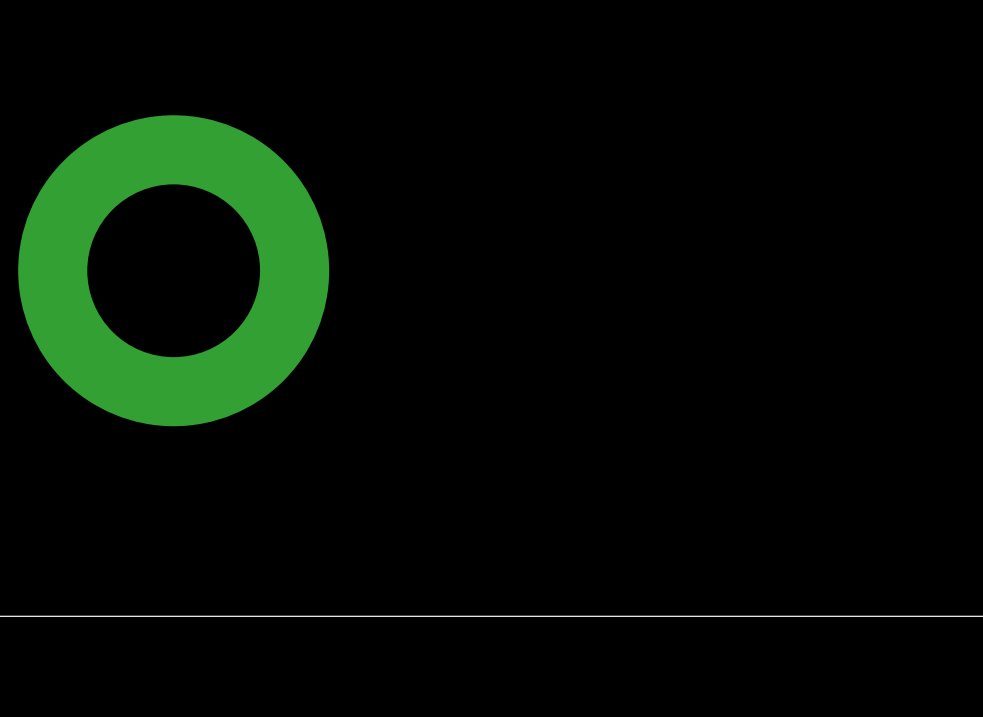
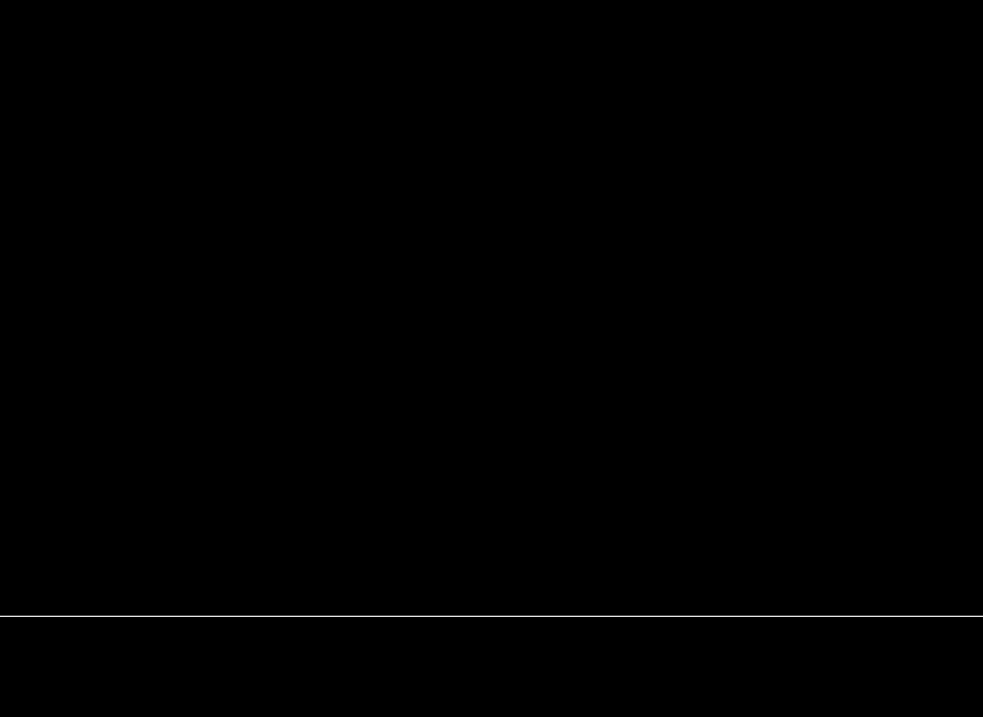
part: (173, 270) -> none

